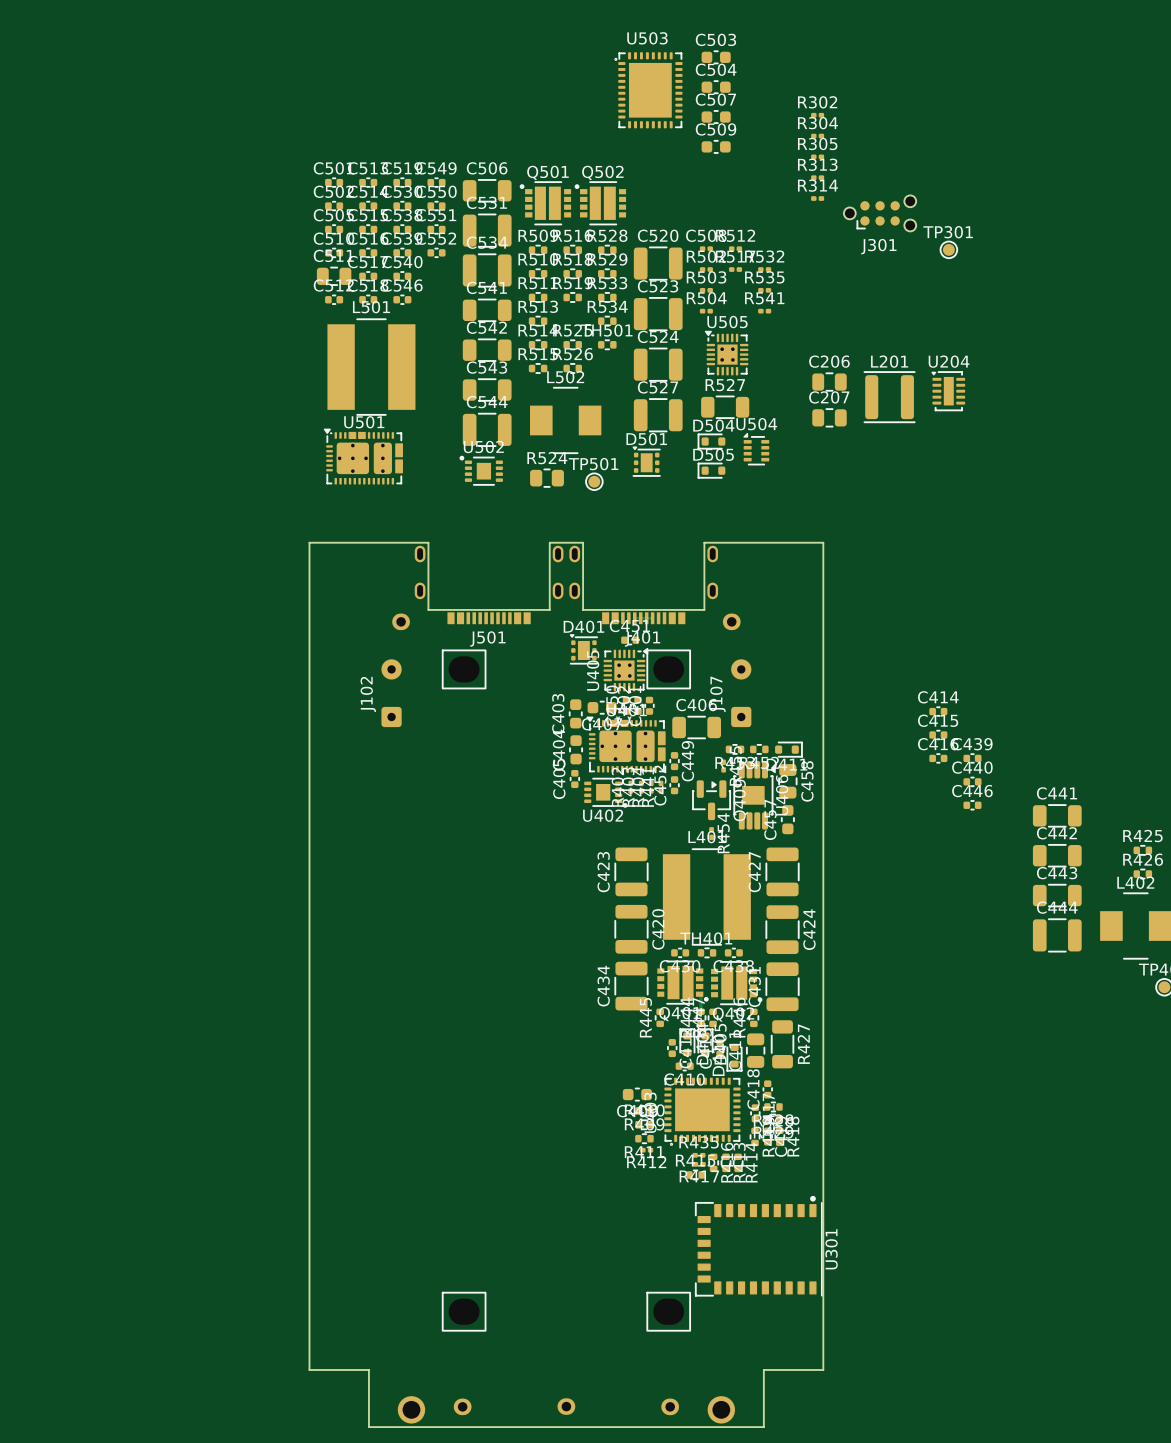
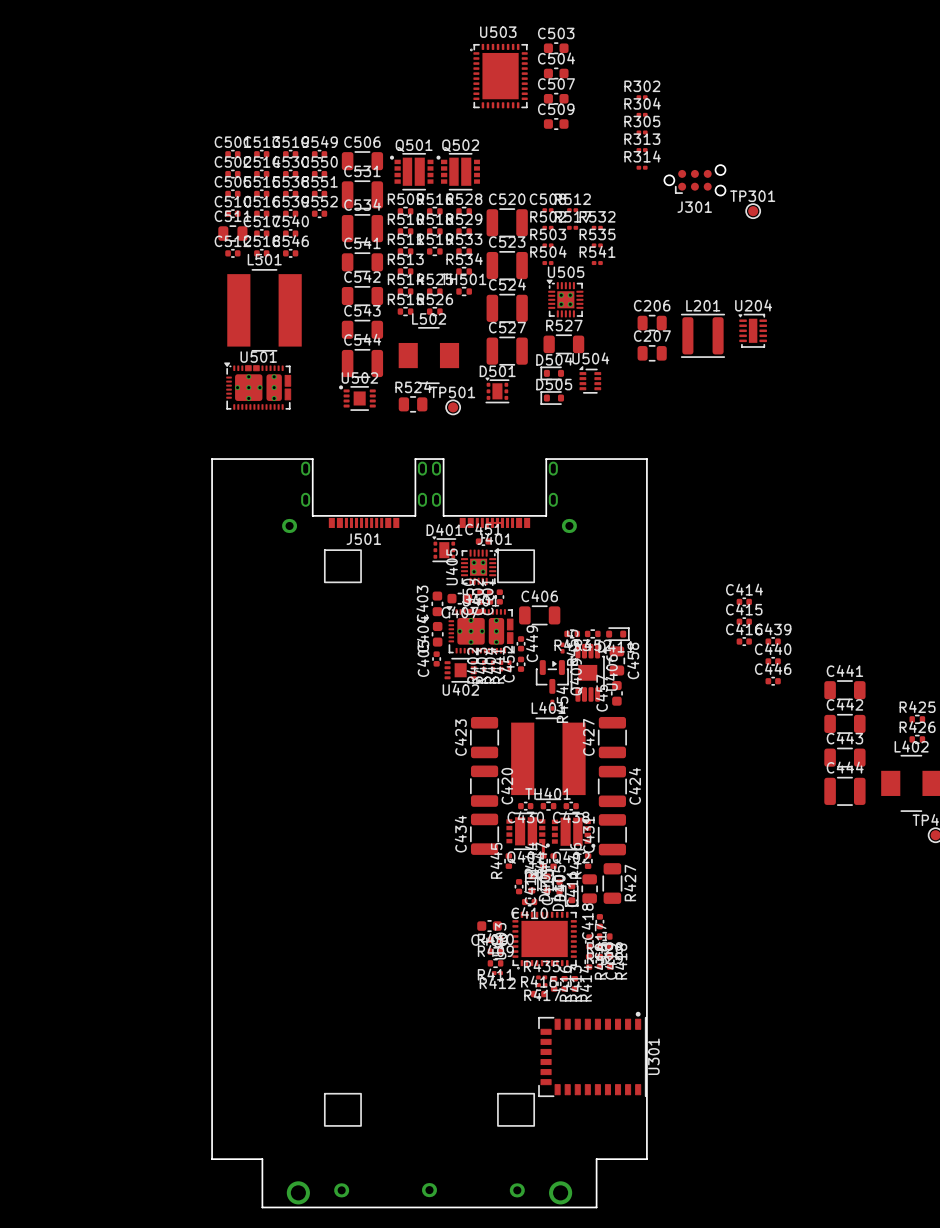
J102: (391, 693) -> none
J107: (741, 693) -> none

